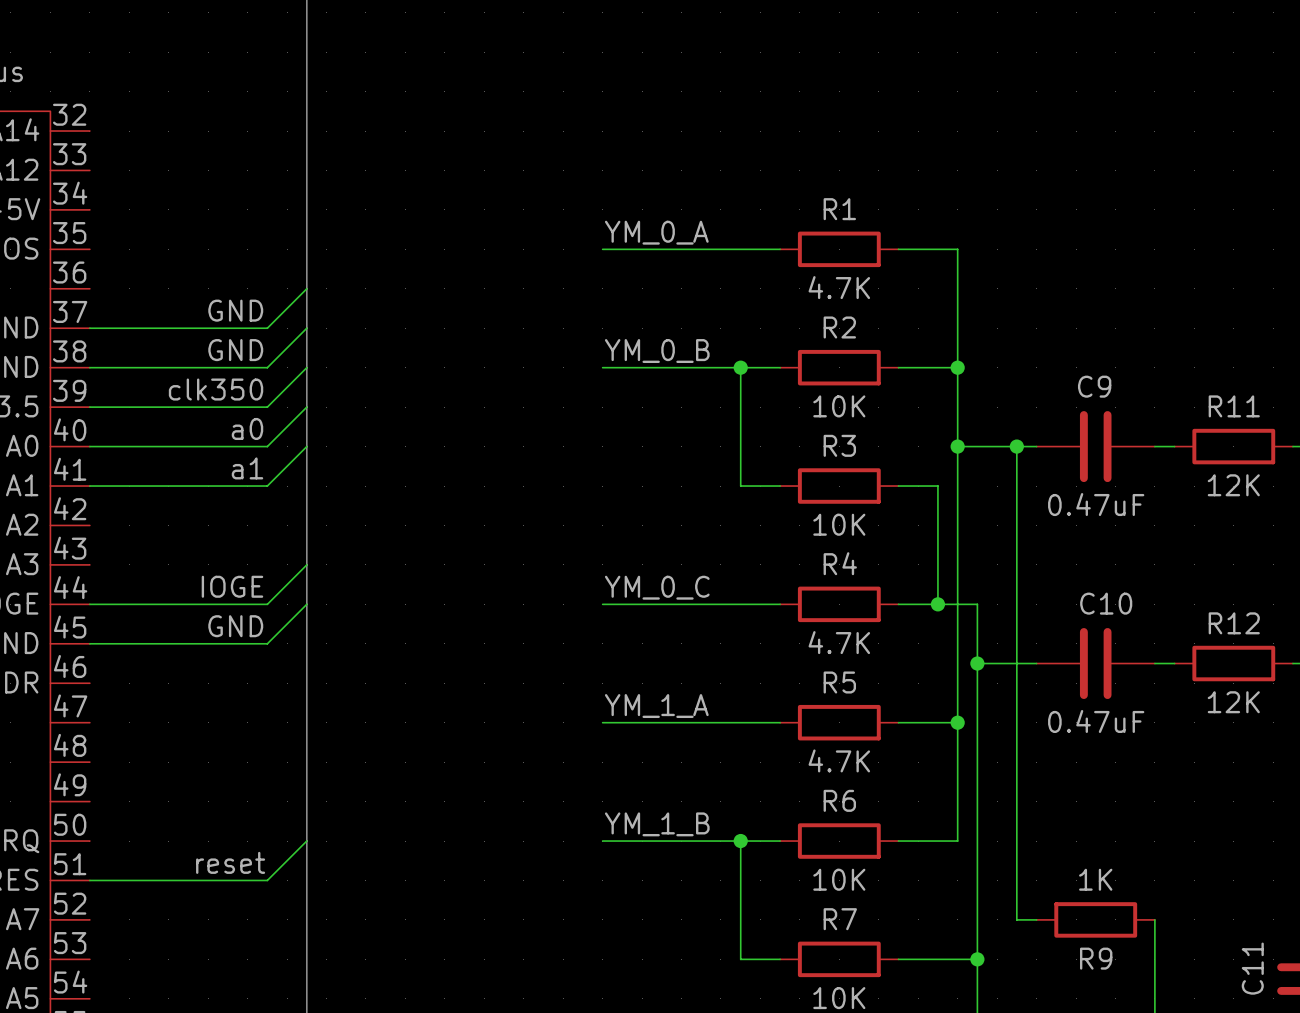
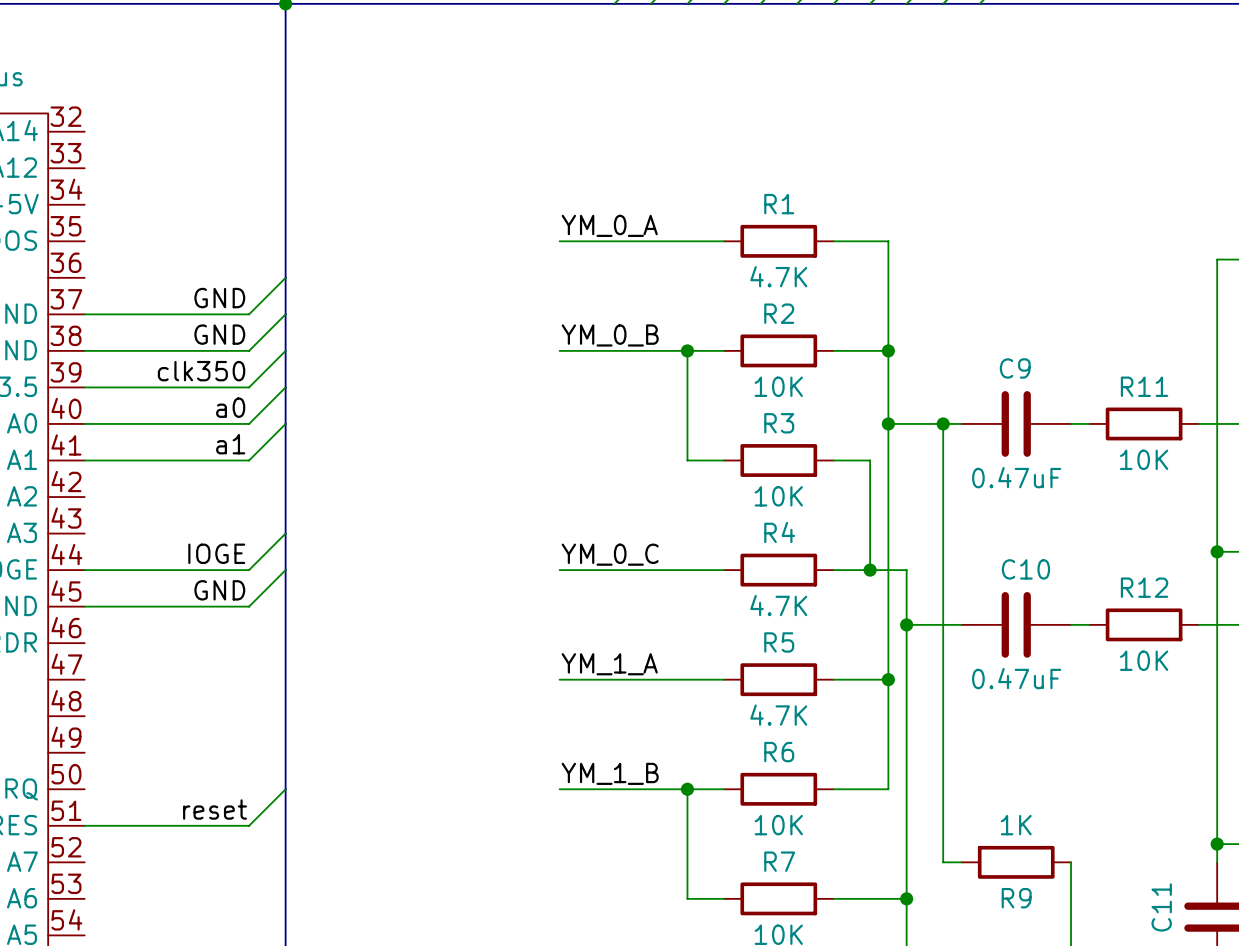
R11 value: 12K (1233, 485) -> 10K (1144, 459)
R12 value: 12K (1233, 702) -> 10K (1144, 660)

